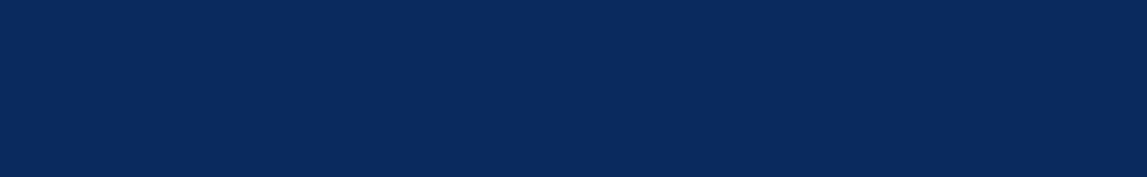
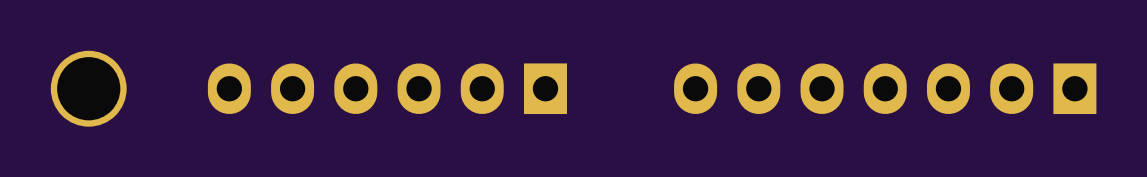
part: none -> (88, 88)
part: none -> (387, 88)
part: none -> (885, 88)

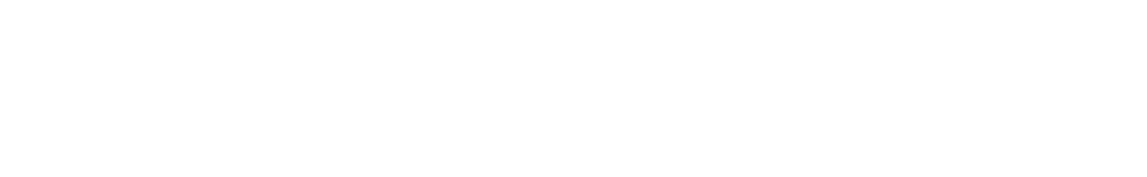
part: (88, 88) -> none
part: (387, 88) -> none
part: (885, 88) -> none

